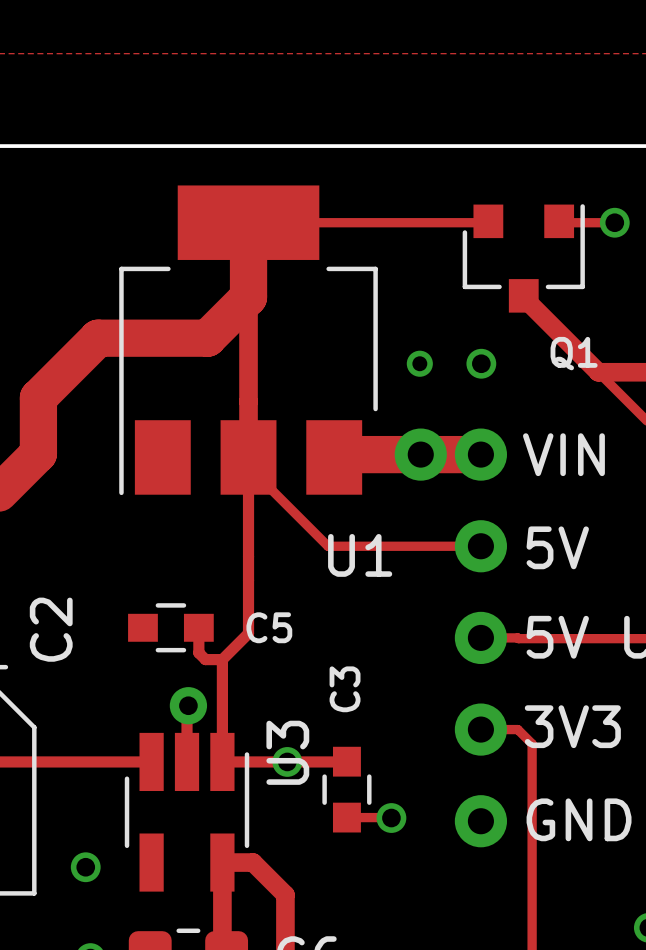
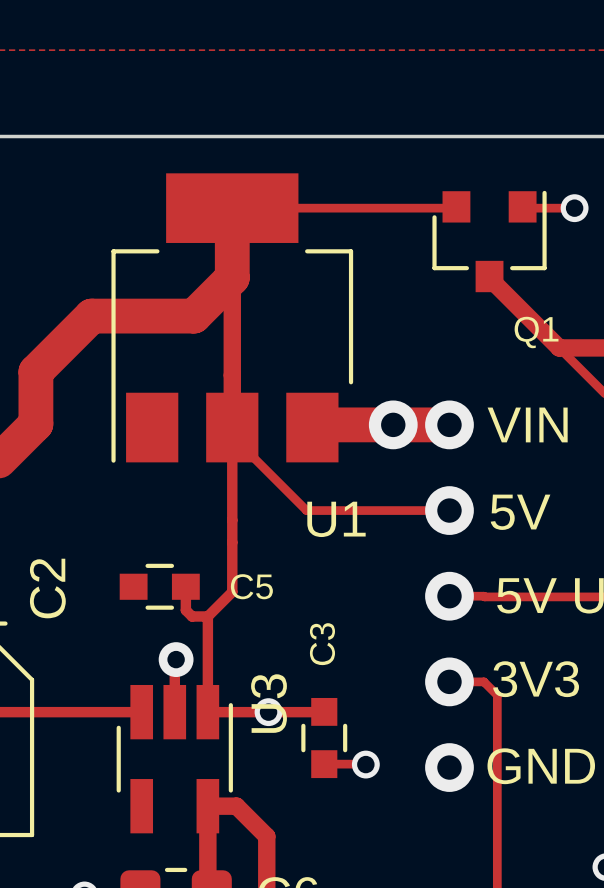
via: (419, 363) -> none
via: (481, 363) -> none
via: (85, 867) -> none

